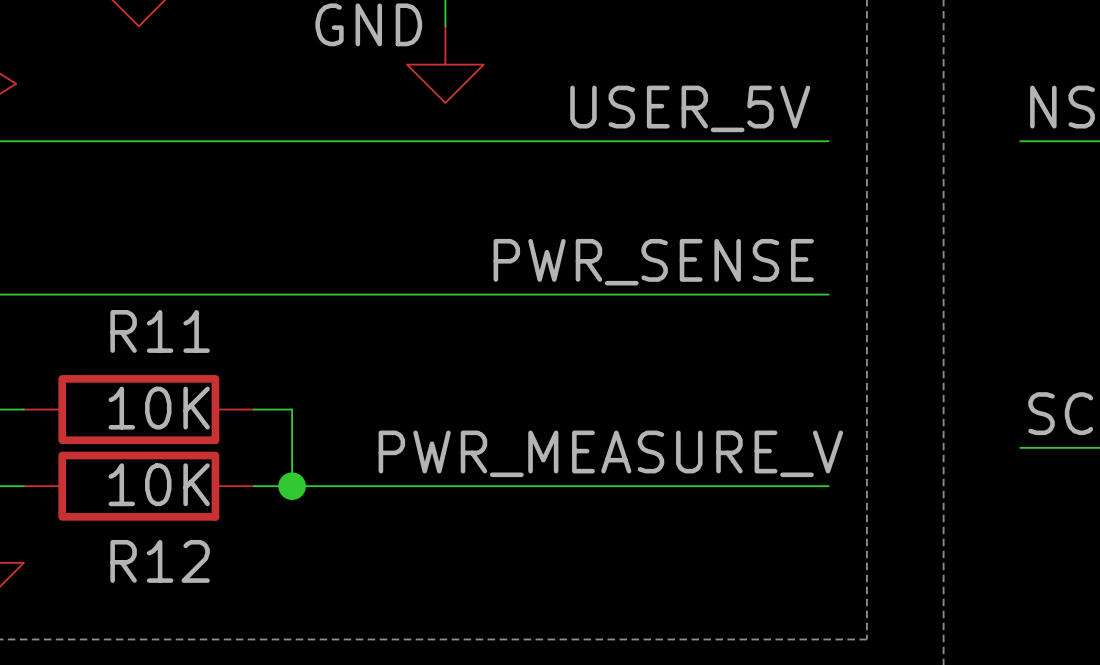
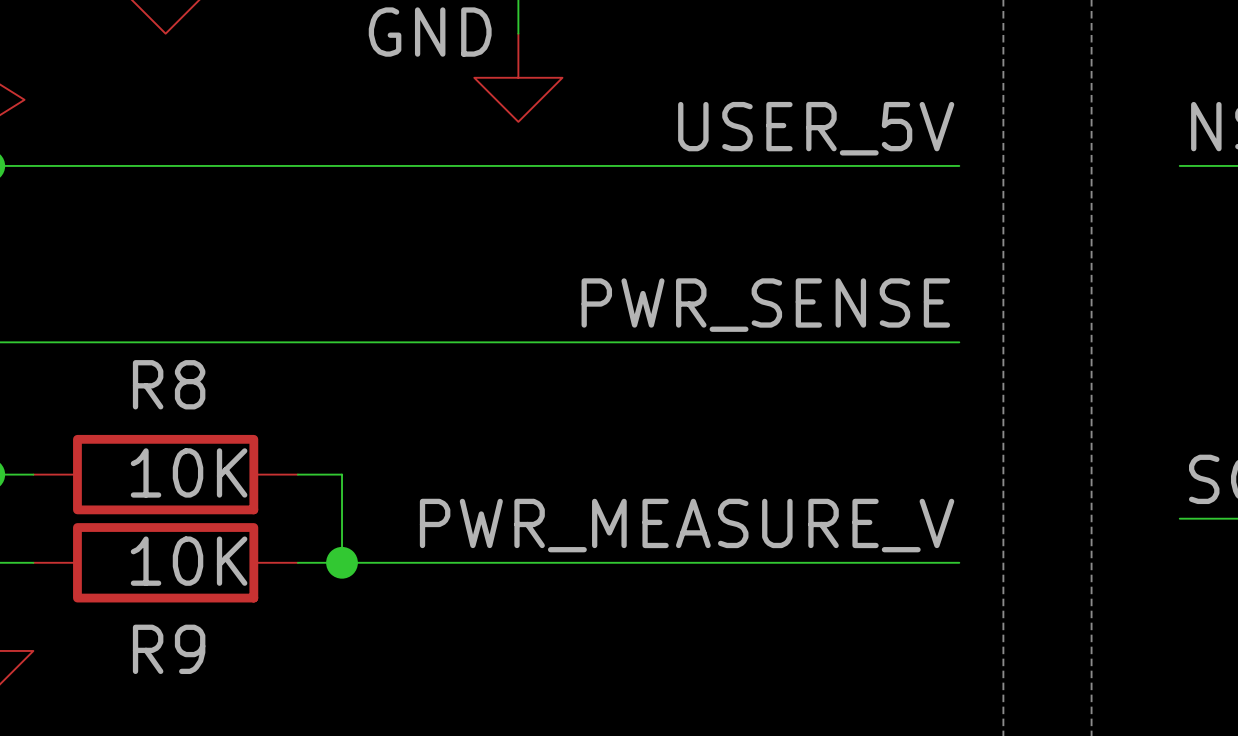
label position: USER_5V (690, 108) -> USER_5V (816, 128)
label position: PWR_SENSE (653, 262) -> PWR_SENSE (765, 305)
R11 name: R11 (160, 331) -> R8 (169, 384)
label position: PWR_MEASURE_V (610, 453) -> PWR_MEASURE_V (687, 525)
R12 name: R12 (160, 561) -> R9 (169, 649)

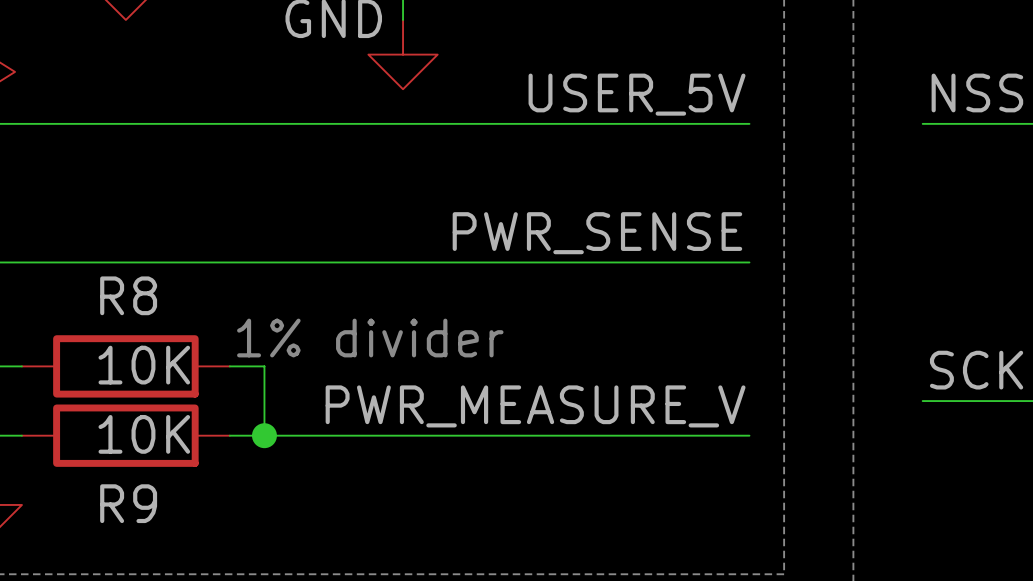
text: none -> 1% divider (370, 338)

